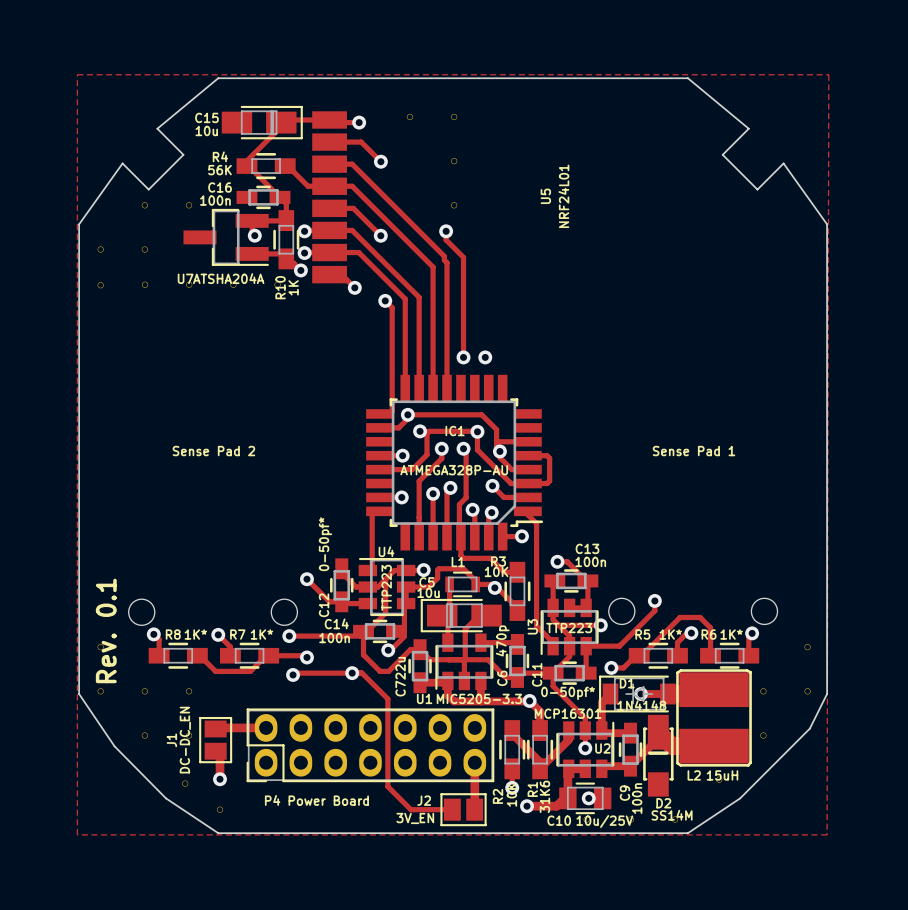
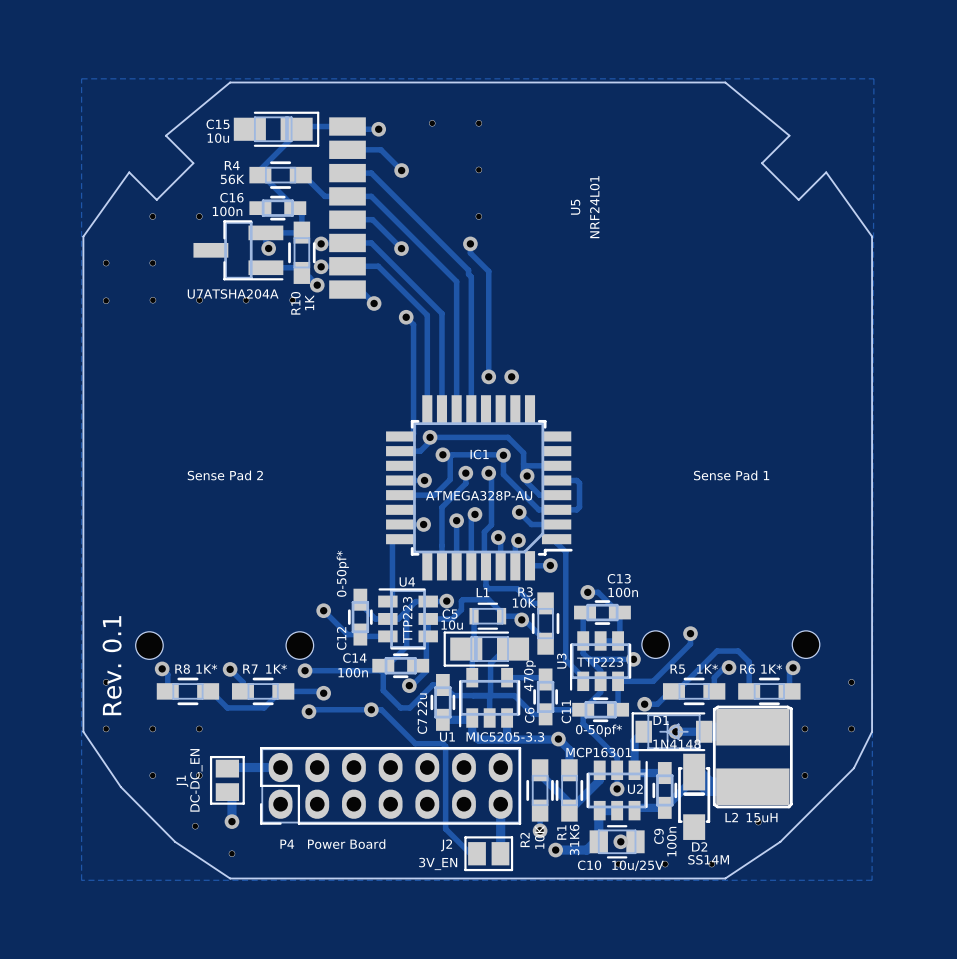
track: (362, 673) (387, 698) (387, 786) (410, 809) (446, 809) -> (381, 709) (415, 743) (442, 743) (445, 746) (445, 828) (470, 853)

